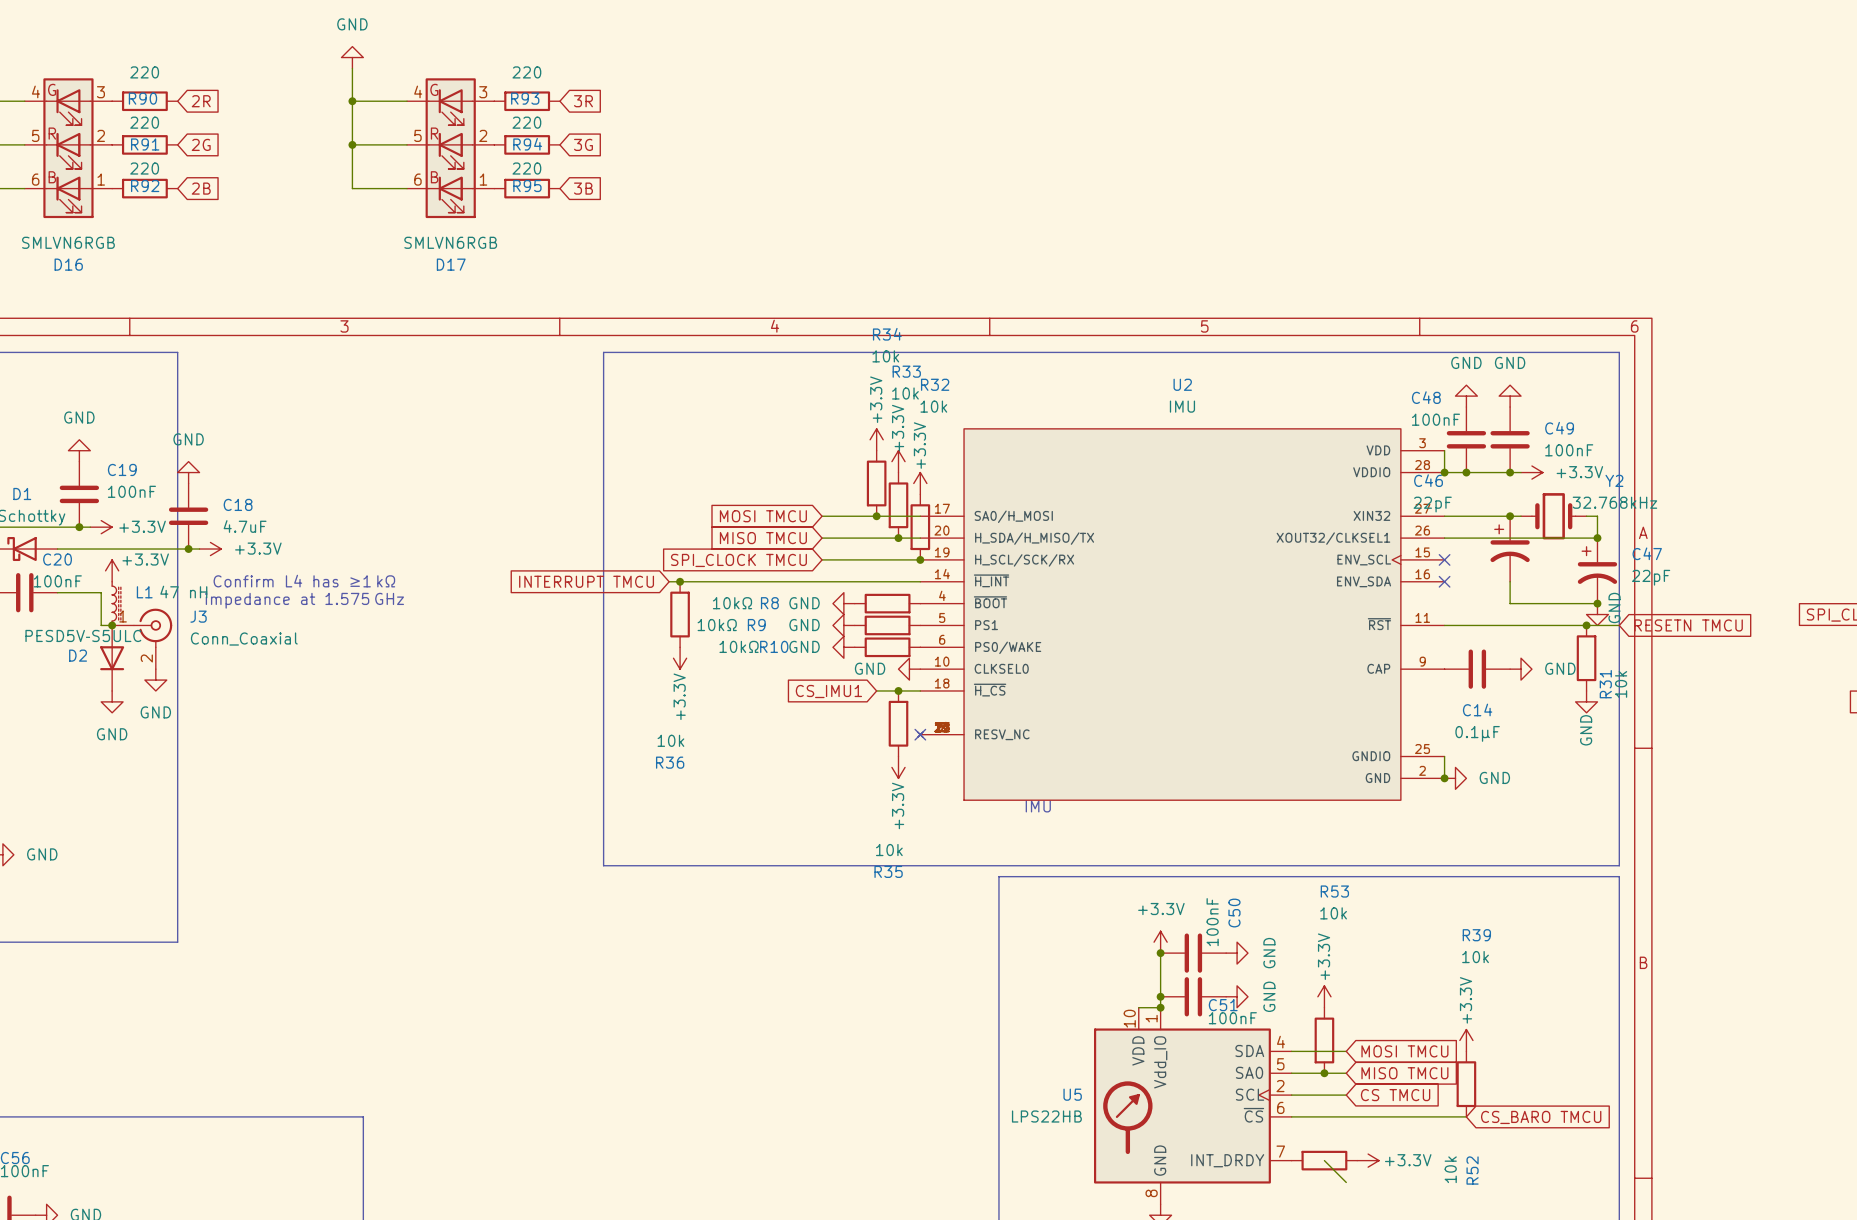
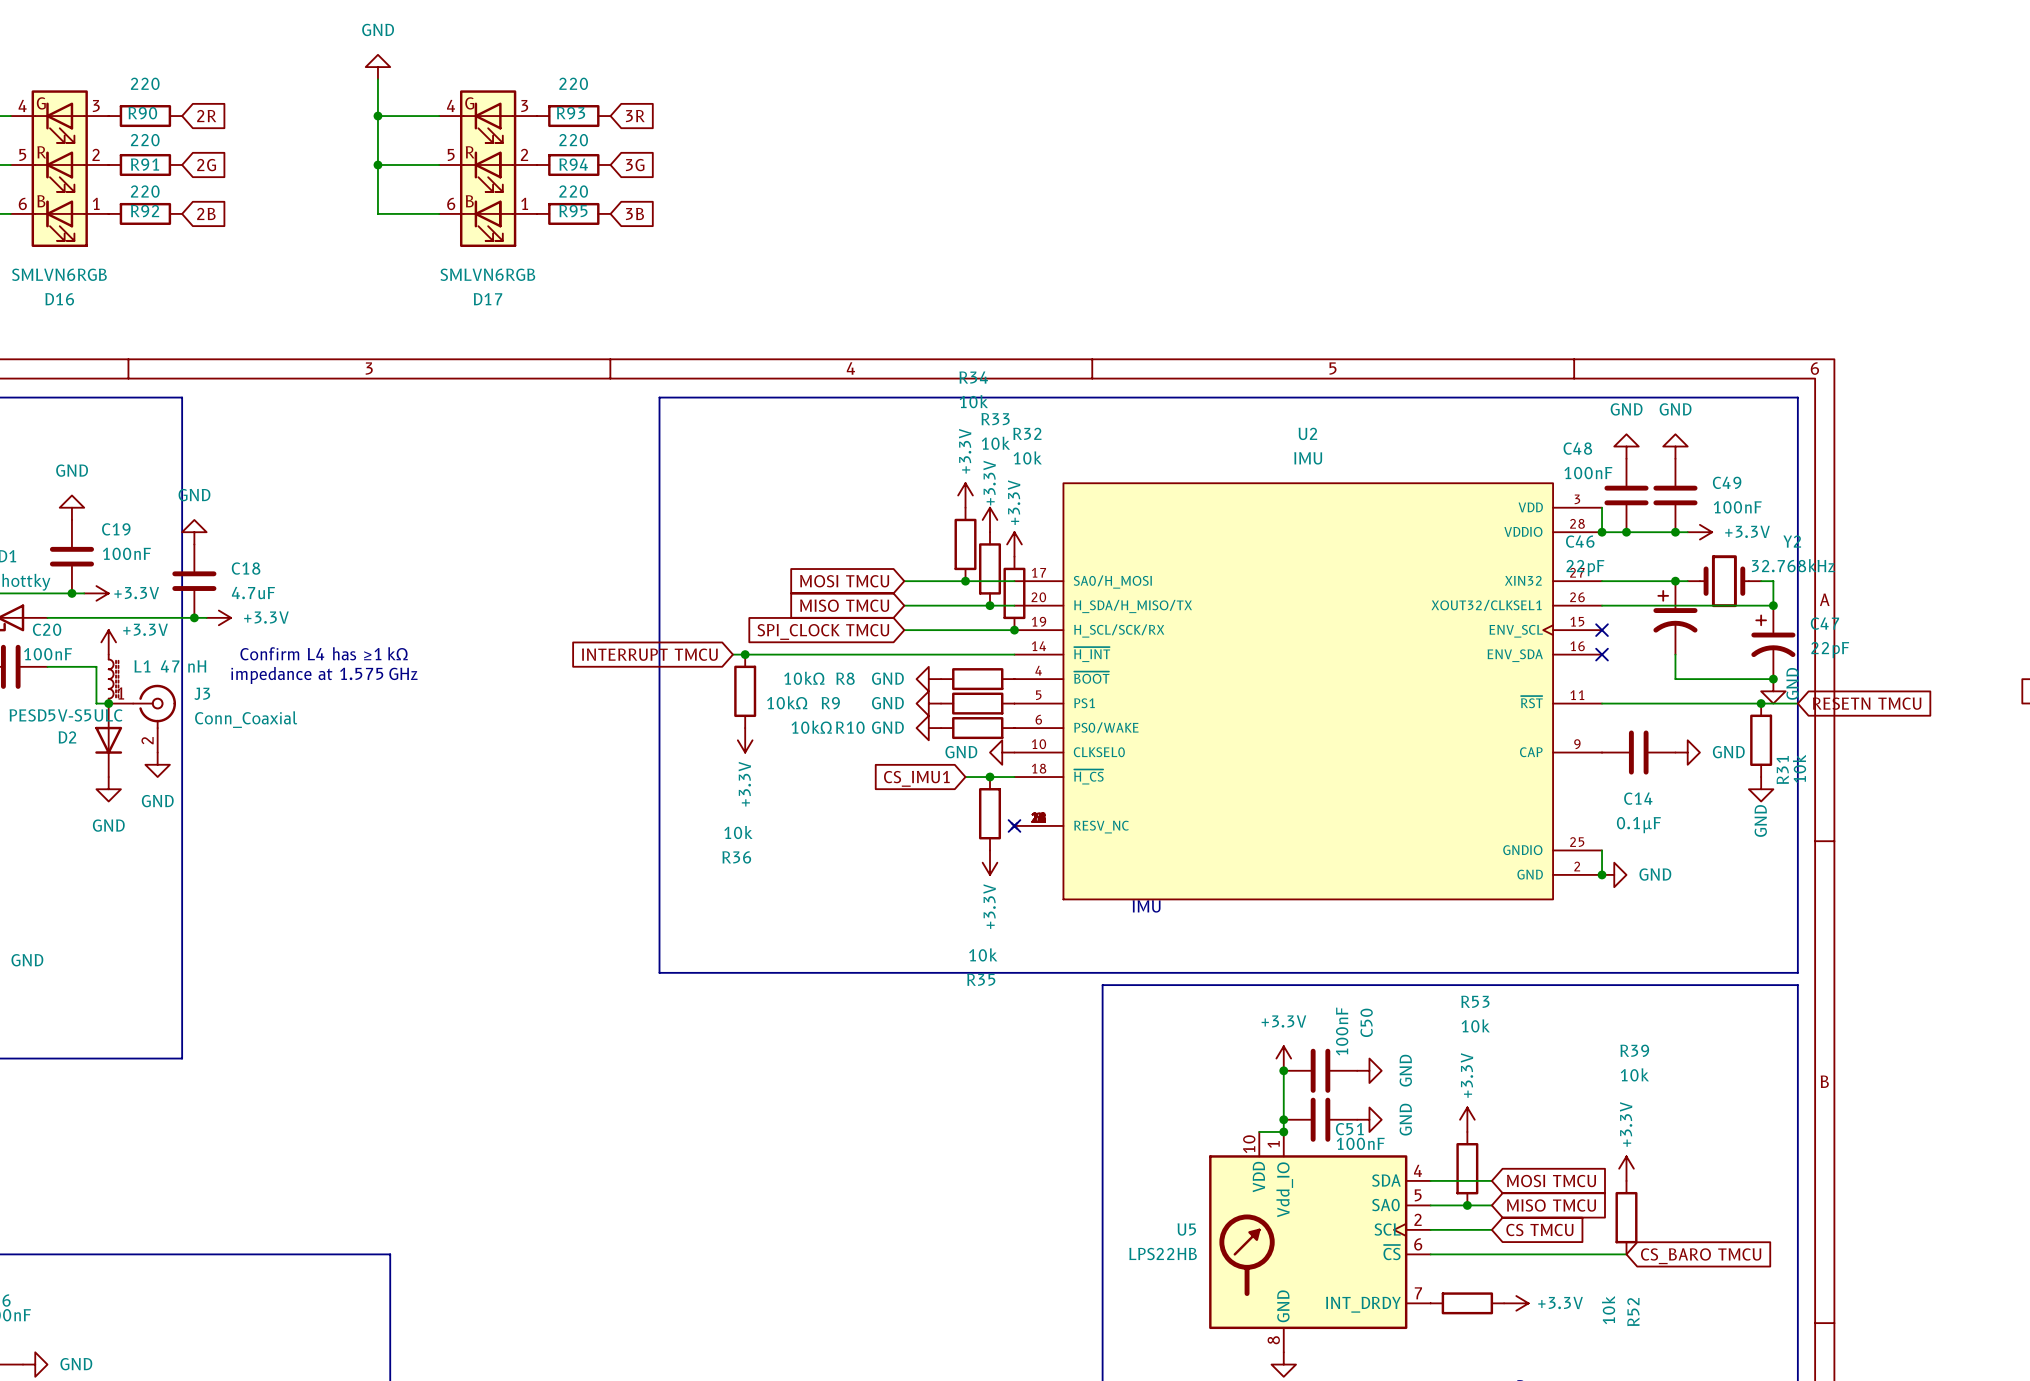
wire: (1324, 1160) (1346, 1182) -> none

